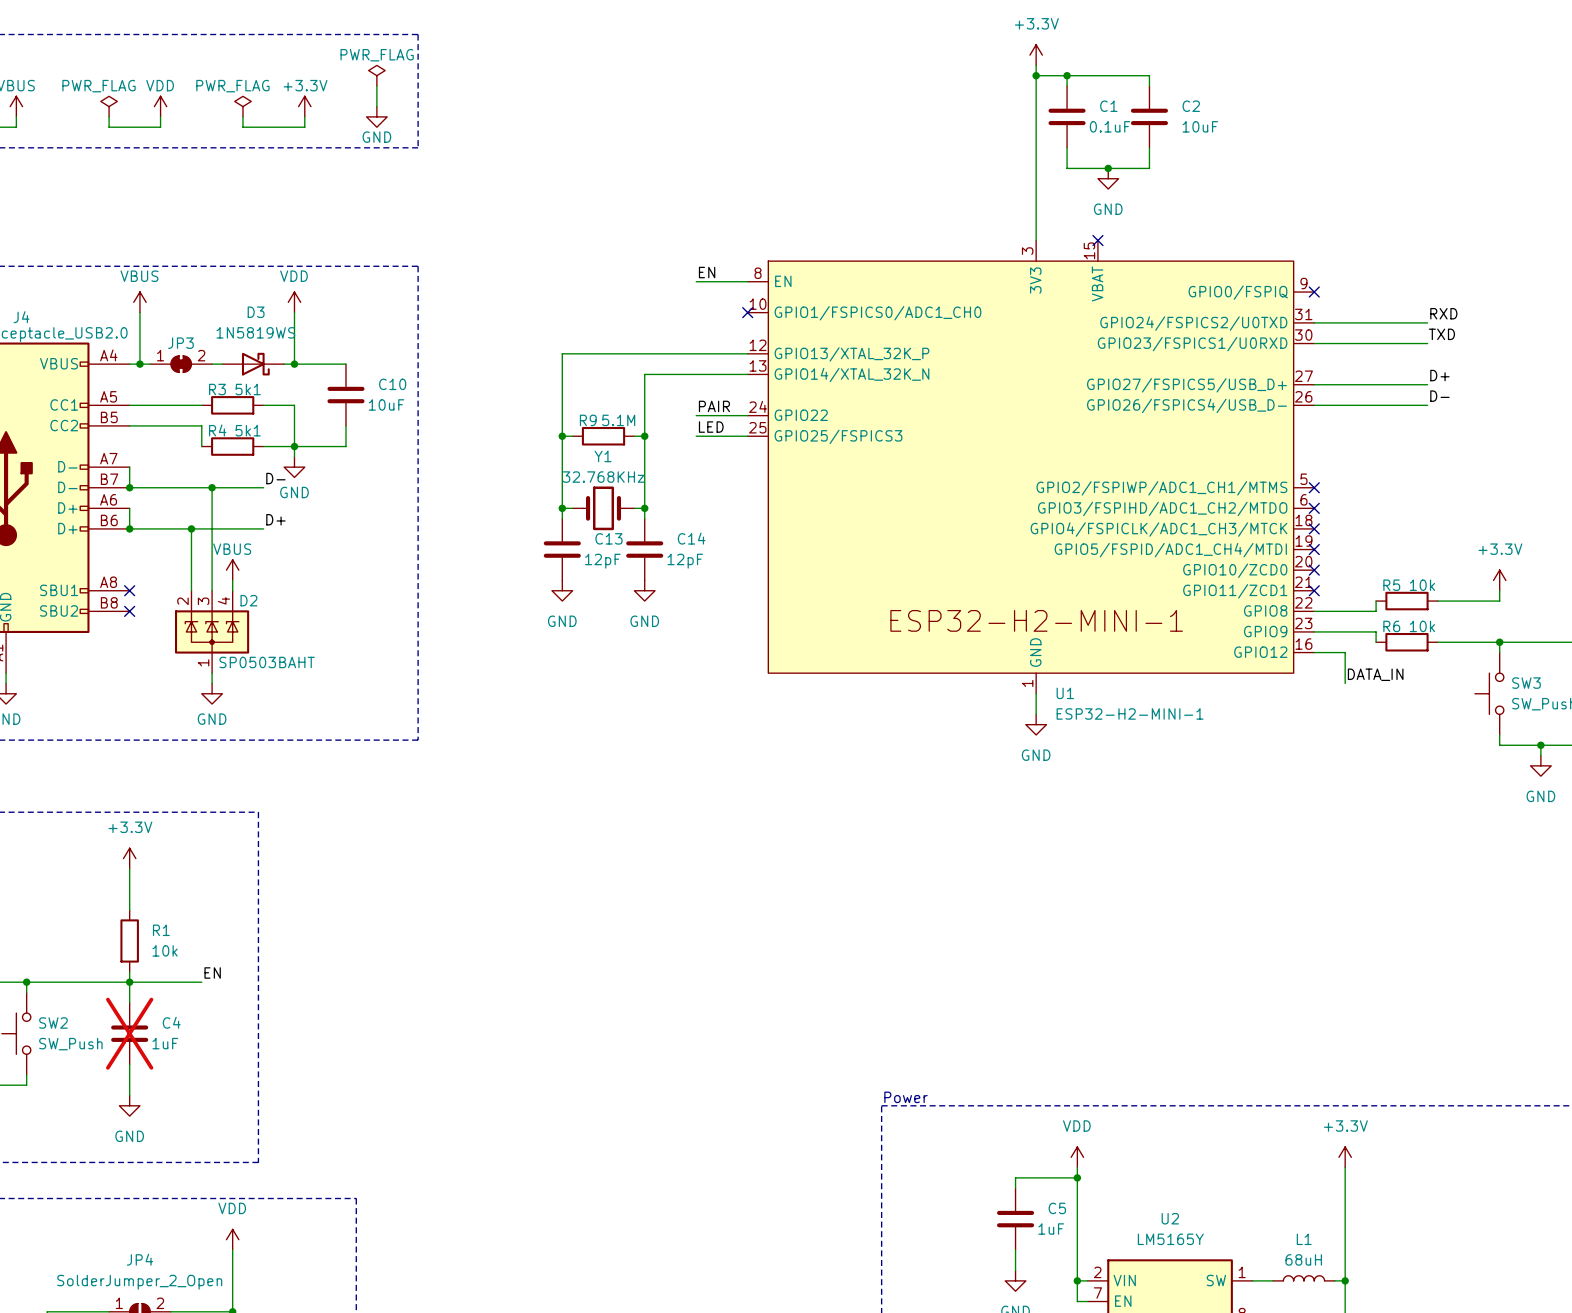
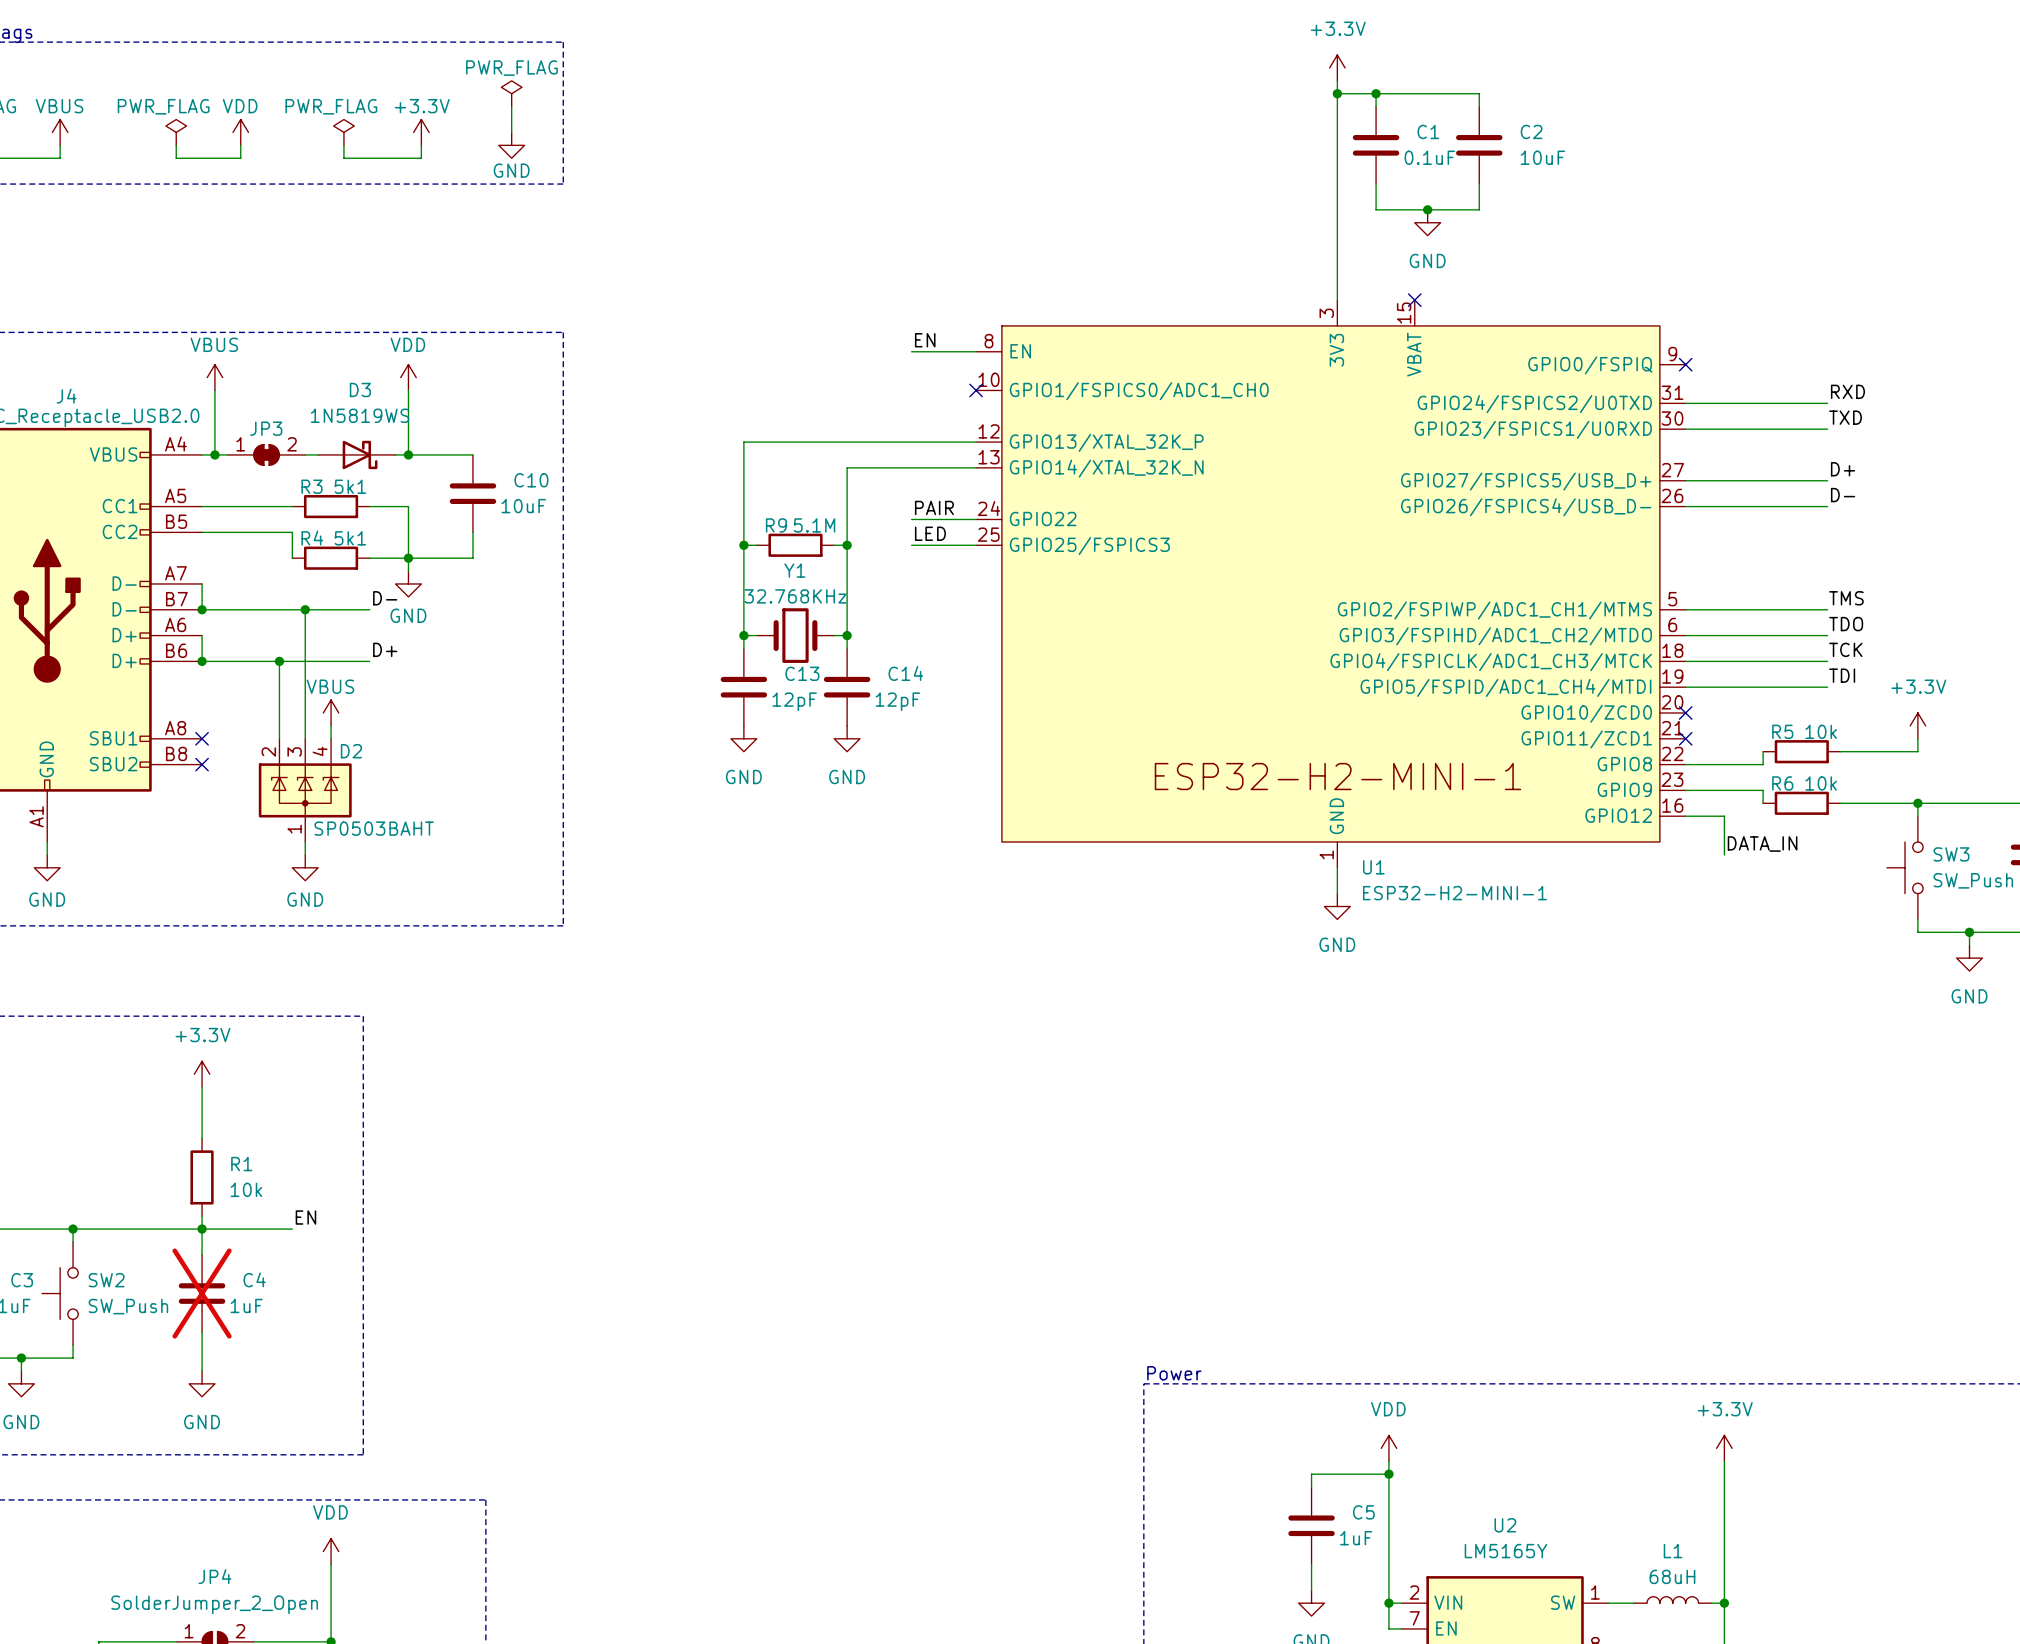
label: none -> TMS (1846, 598)
wire: none -> (1685, 609) (1827, 609)
no-connect mark: (1314, 487) -> none
label: none -> TDO (1846, 624)
wire: none -> (1685, 635) (1827, 635)
no-connect mark: (1314, 508) -> none
label: none -> TCK (1845, 649)
wire: none -> (1685, 661) (1827, 661)
no-connect mark: (1314, 528) -> none
label: none -> TDI (1842, 675)
wire: none -> (1685, 687) (1827, 687)
no-connect mark: (1314, 549) -> none

